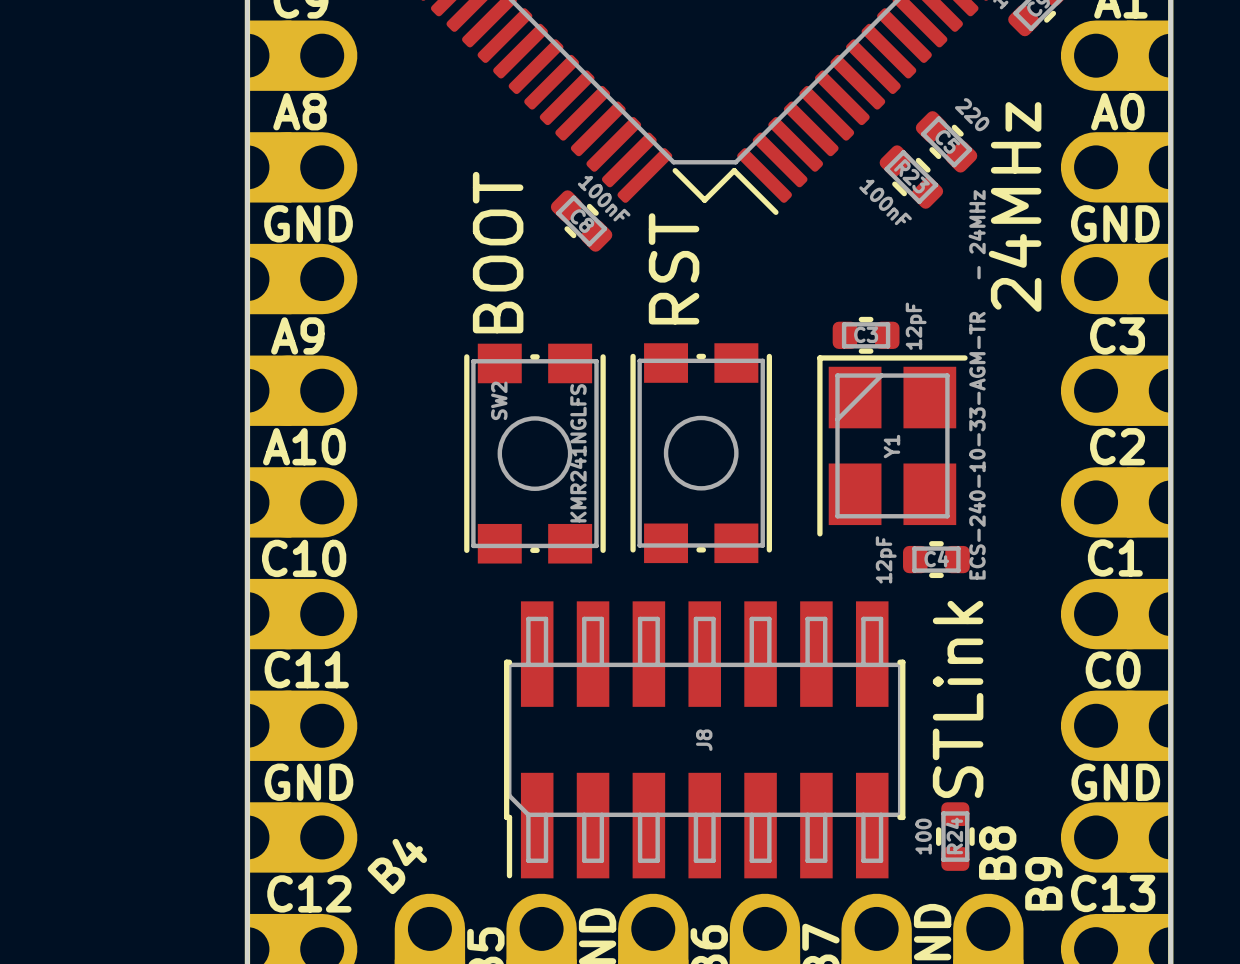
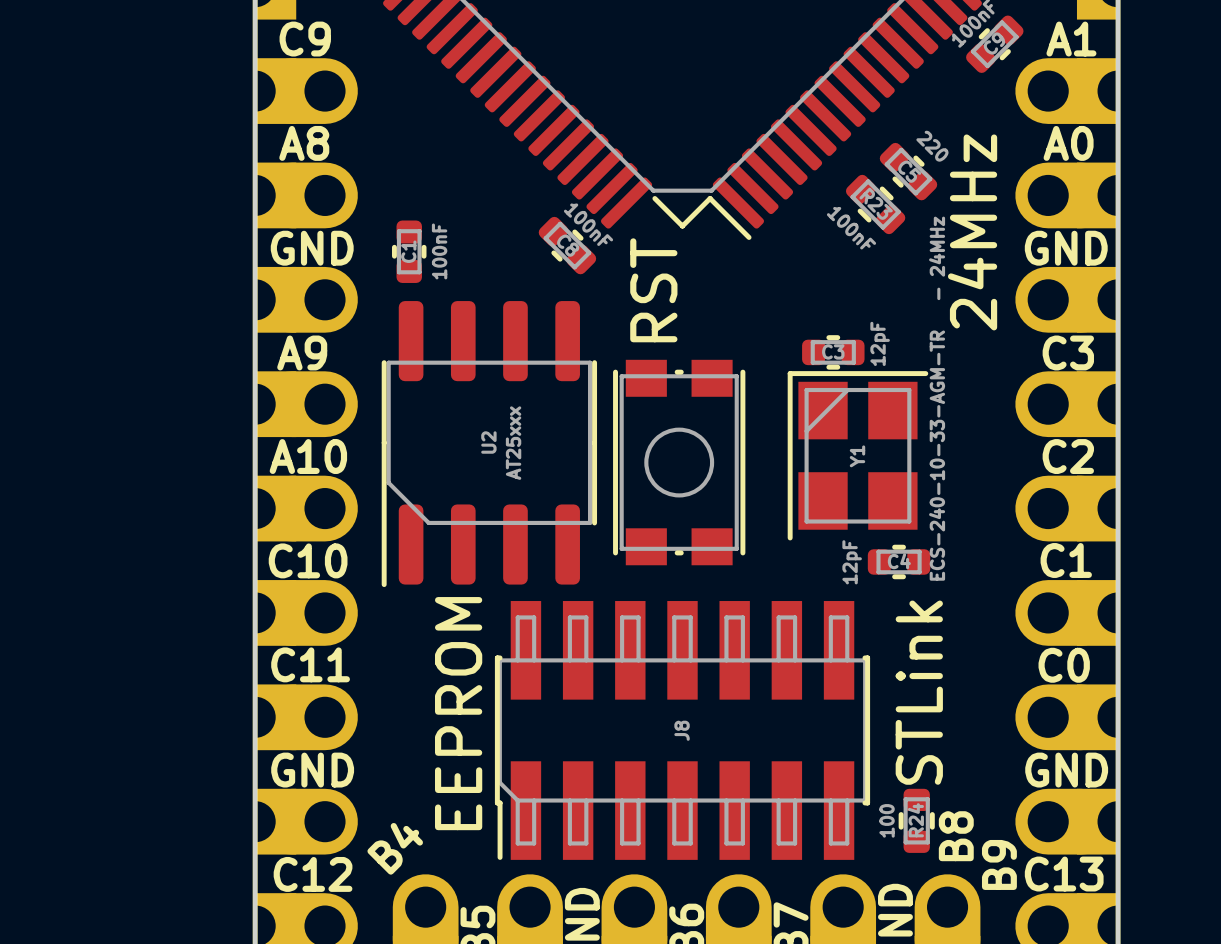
C1: none -> 100nF (409, 251)
U2: none -> AT25xxx (489, 444)
SW2: KMR241NGLFS (534, 453) -> none

